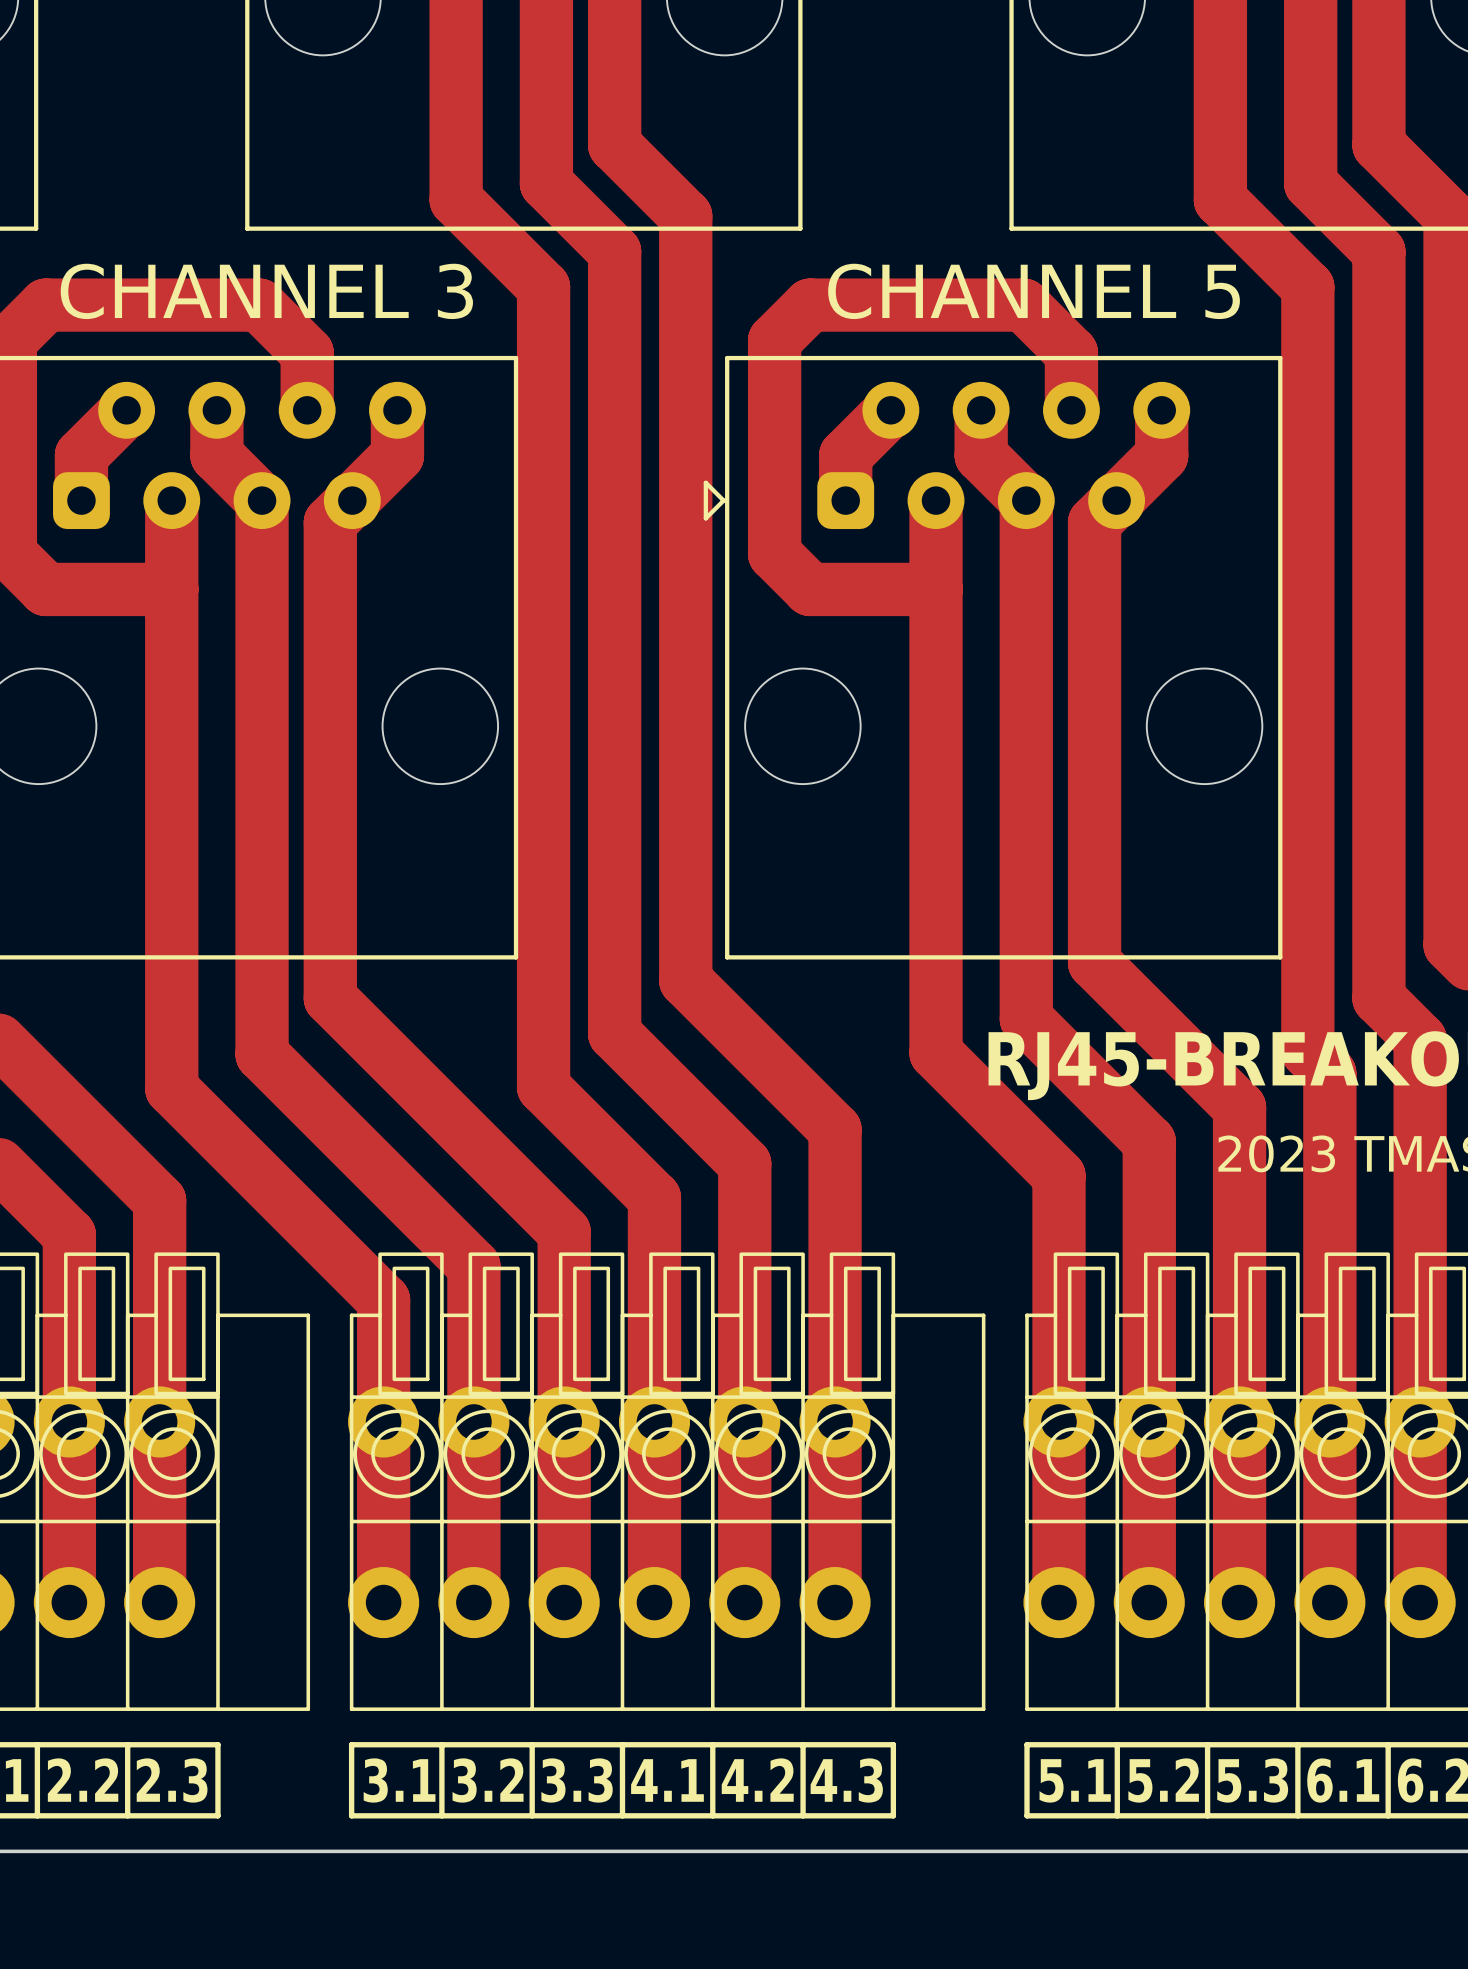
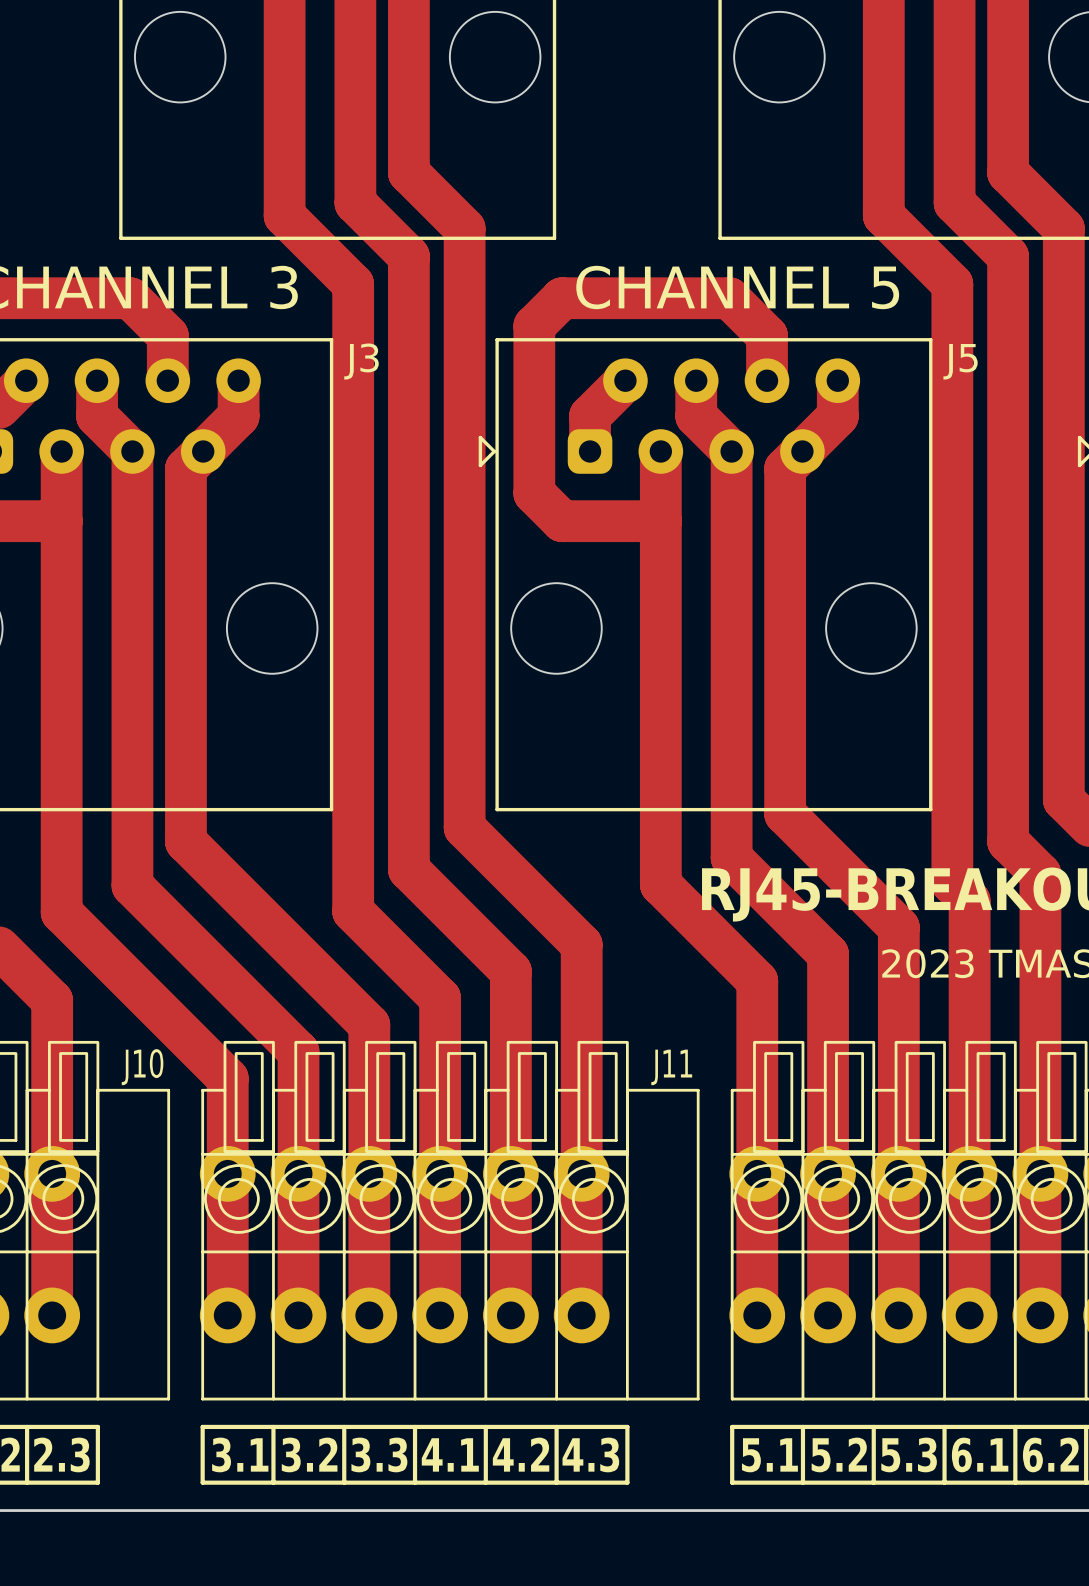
J3 name: none -> J3 (361, 361)
J5 name: none -> J5 (960, 361)
J10 name: none -> J10 (142, 1067)
J11 name: none -> J11 (671, 1067)

